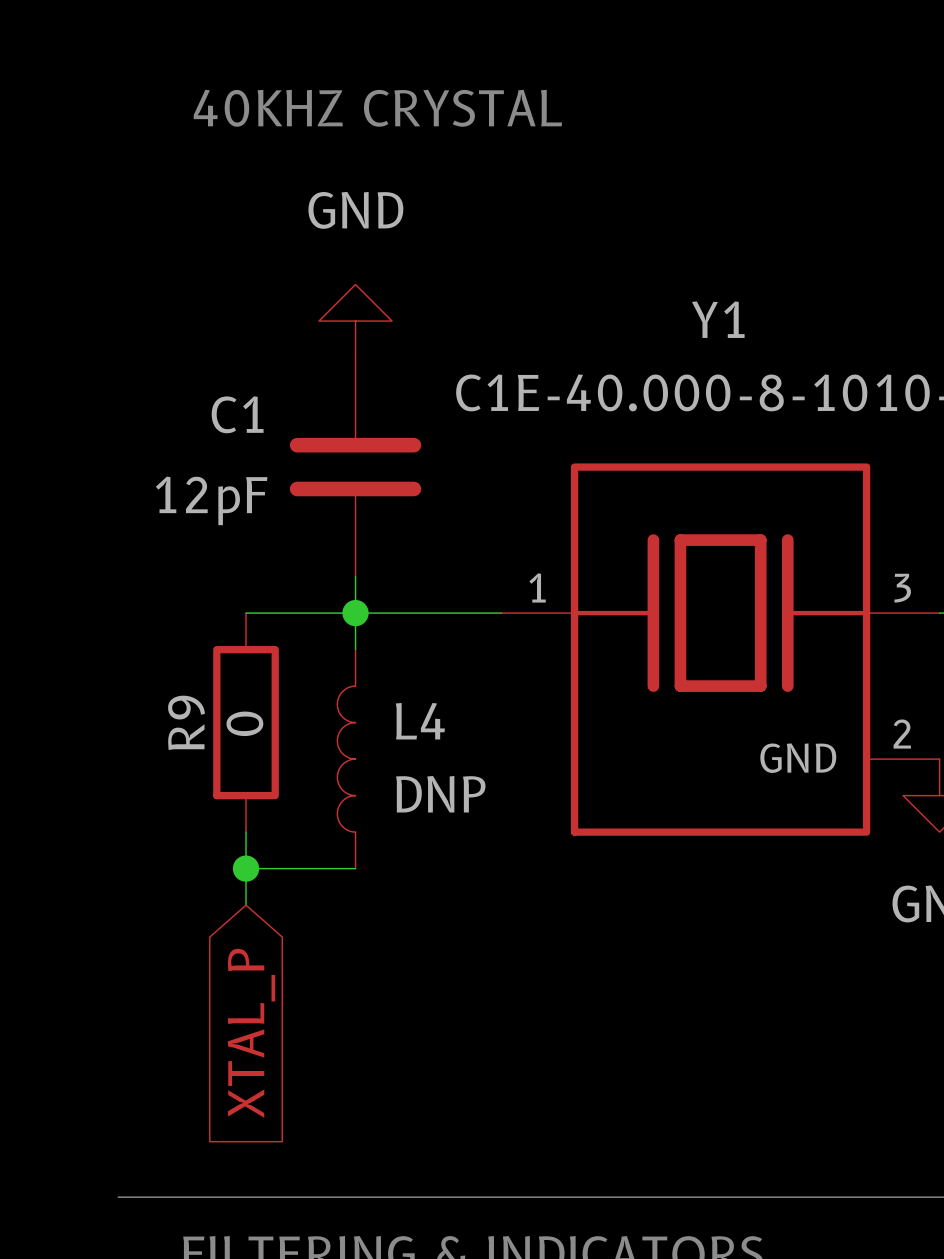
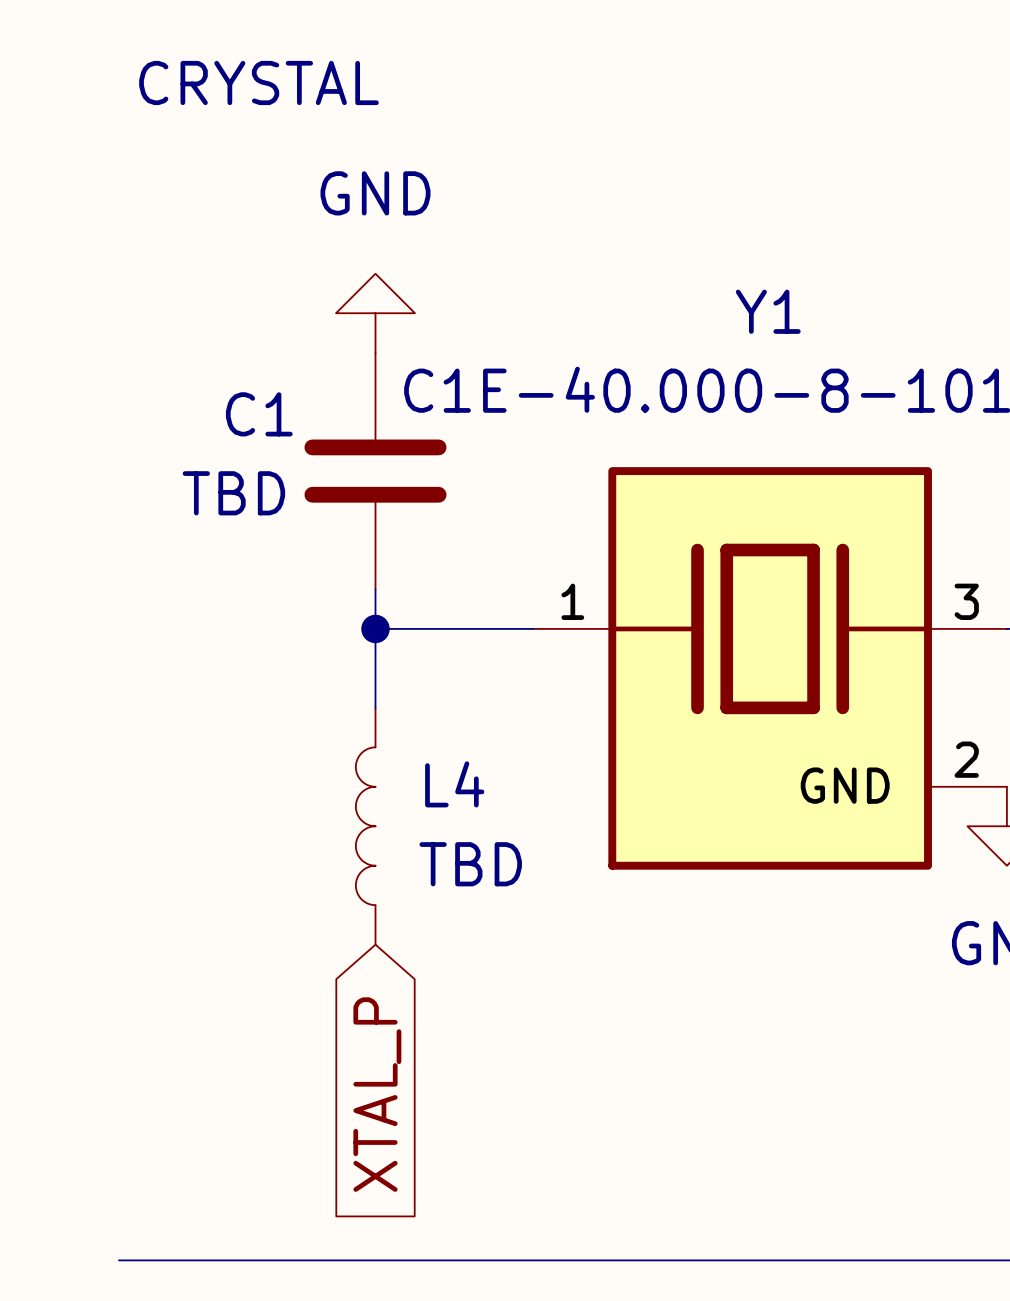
text: 40KHZ CRYSTAL (377, 108) -> CRYSTAL (258, 82)
C1 value: 12pF (211, 500) -> TBD (233, 493)
wire: (246, 613) (355, 613) -> none
R9: 0 (246, 722) -> none
L4 position: (346, 759) -> (365, 826)
L4 value: DNP (440, 794) -> TBD (470, 864)
wire: (246, 832) (246, 905) -> none
wire: (246, 868) (355, 868) -> none
junction: (246, 868) -> none
global label position: XTAL_P (251, 1033) -> XTAL_P (377, 1094)

